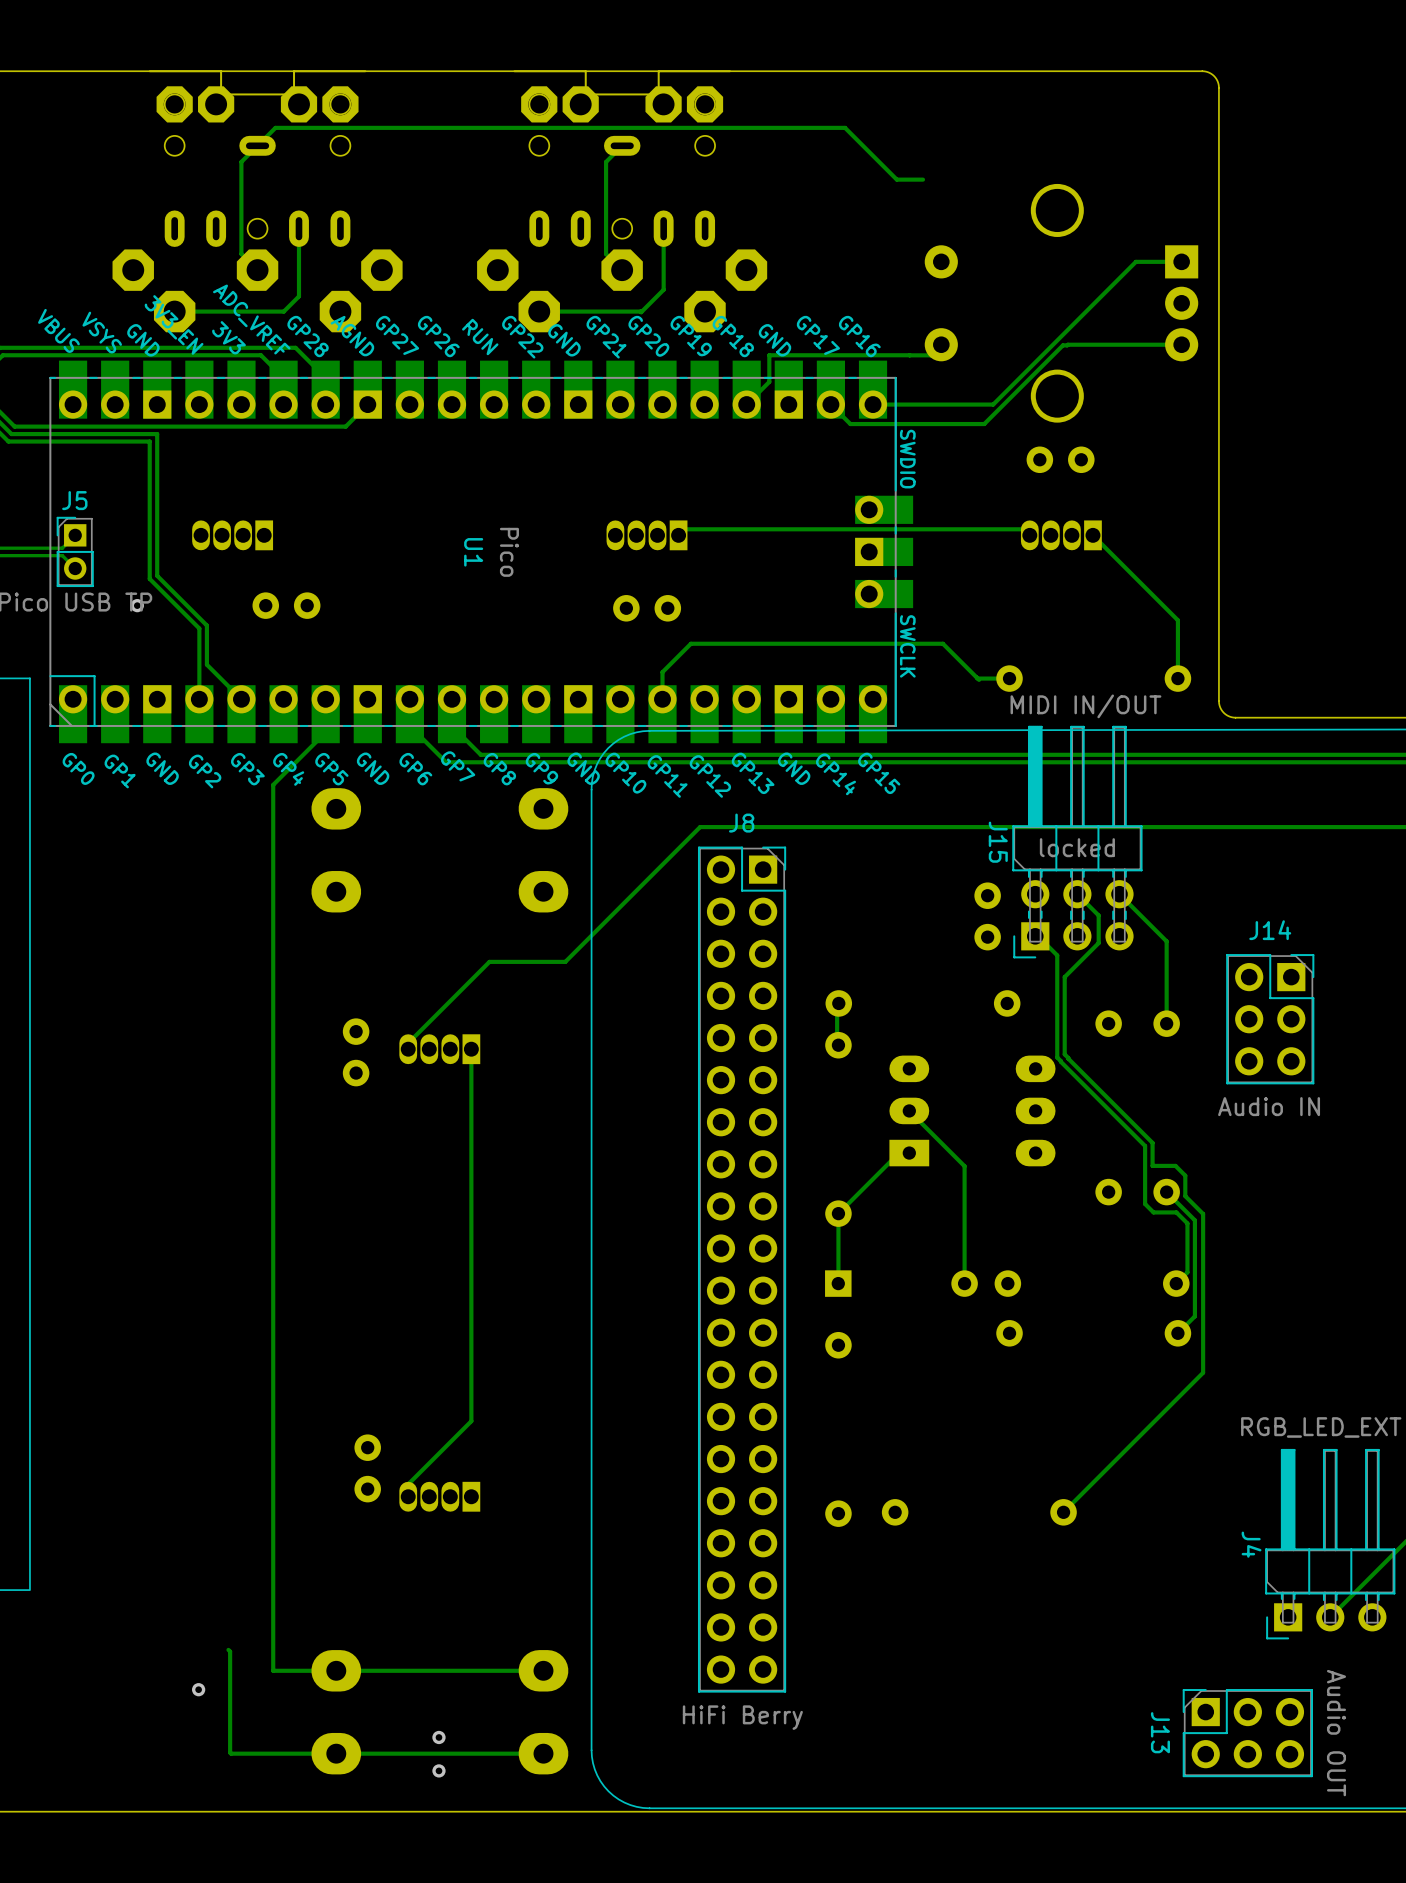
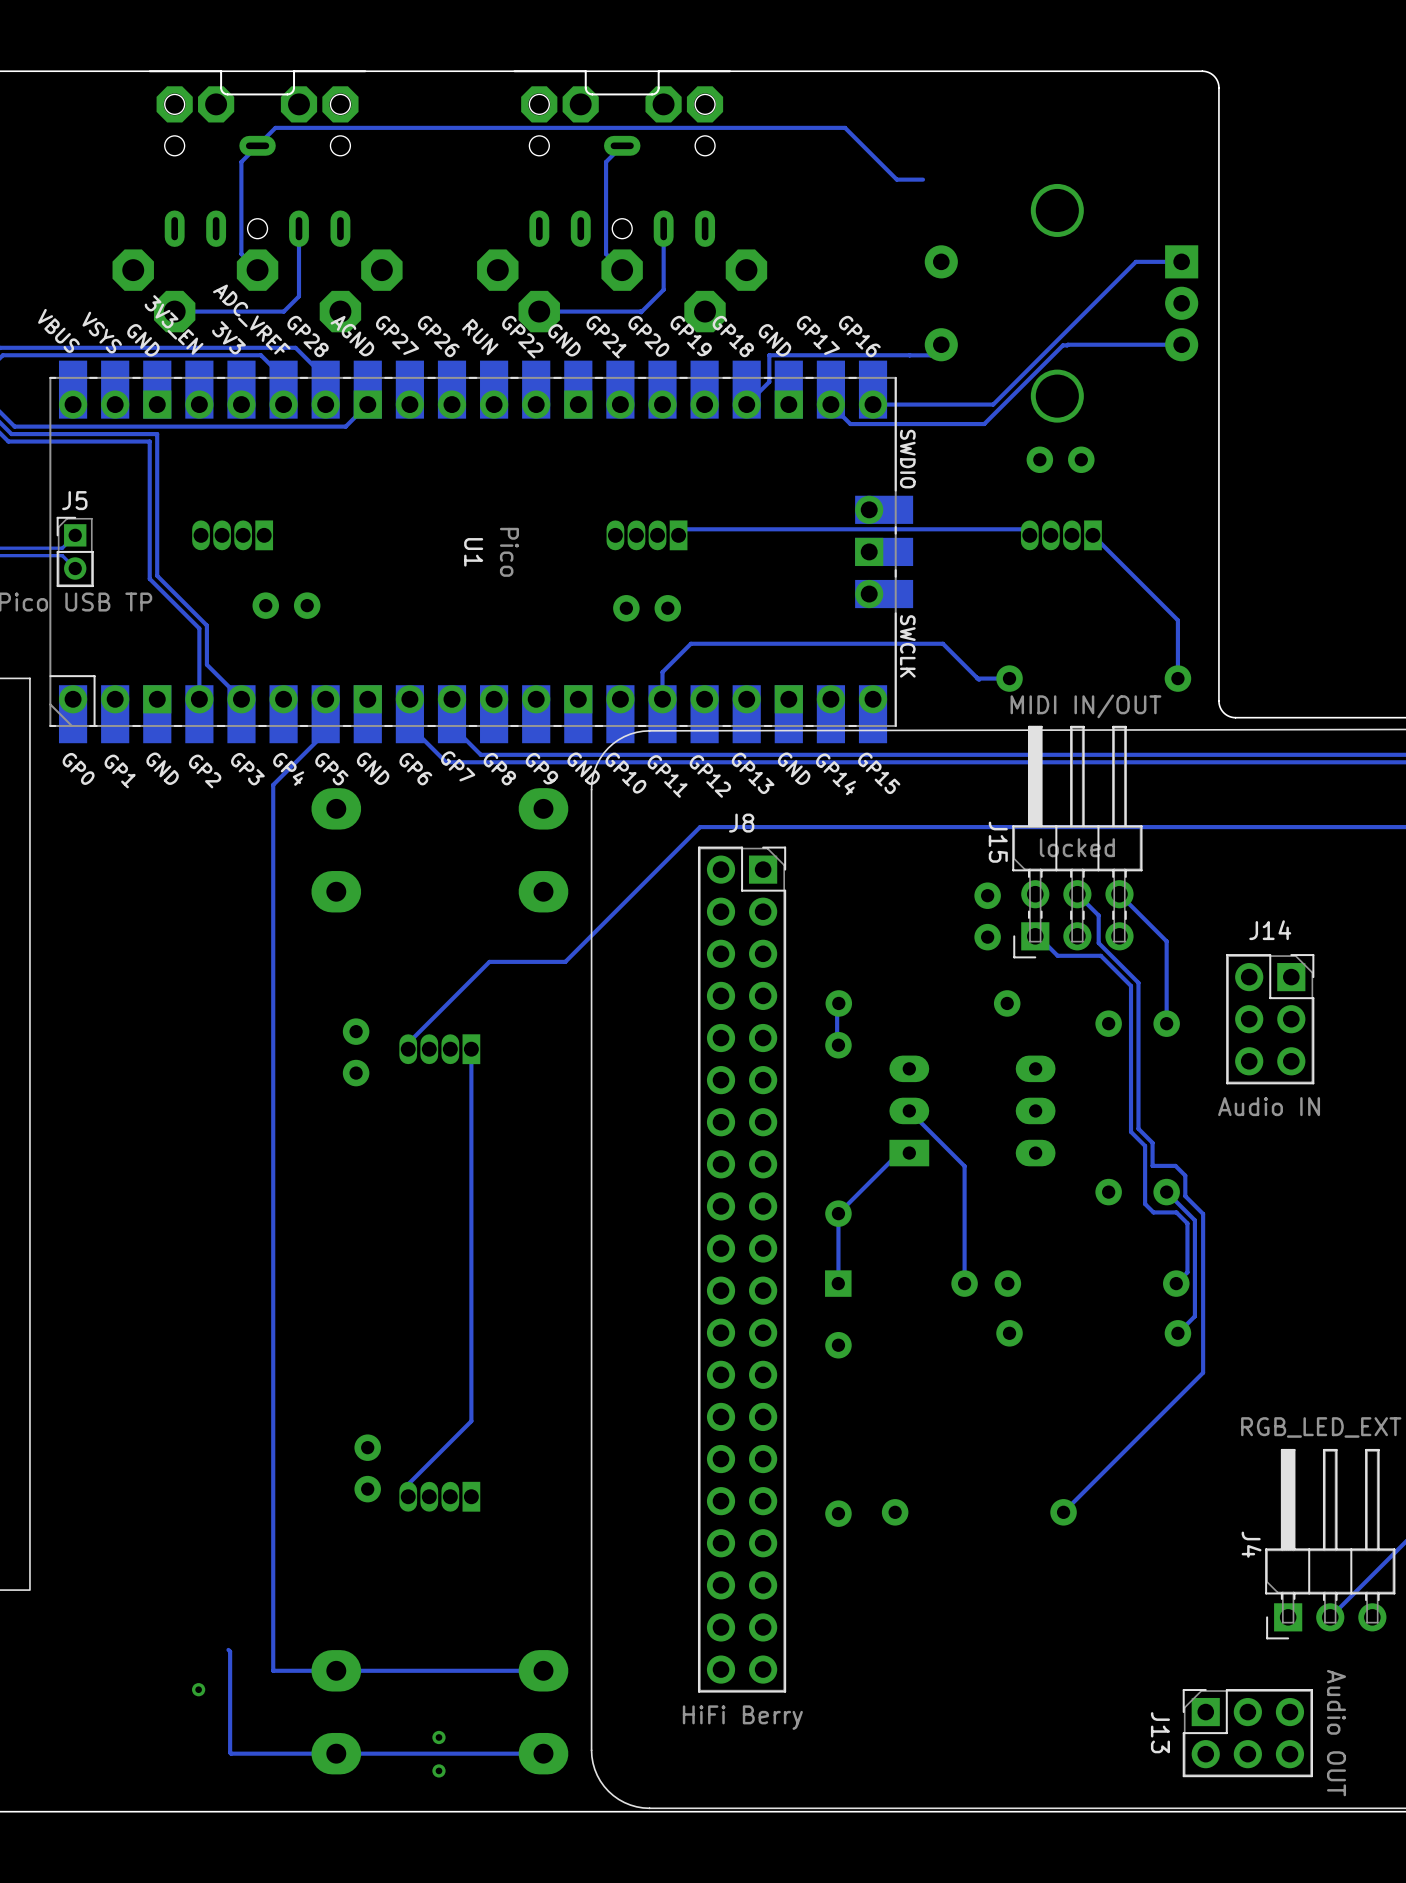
via: (137, 605) -> none
track: (1098, 943) (1064, 977) (1064, 1054) (1138, 1128) -> (1098, 943) (1138, 982) (1138, 1128)
track: (1057, 955) (1057, 1057) (1131, 1131) -> (1057, 955) (1100, 955) (1131, 985) (1131, 1131)

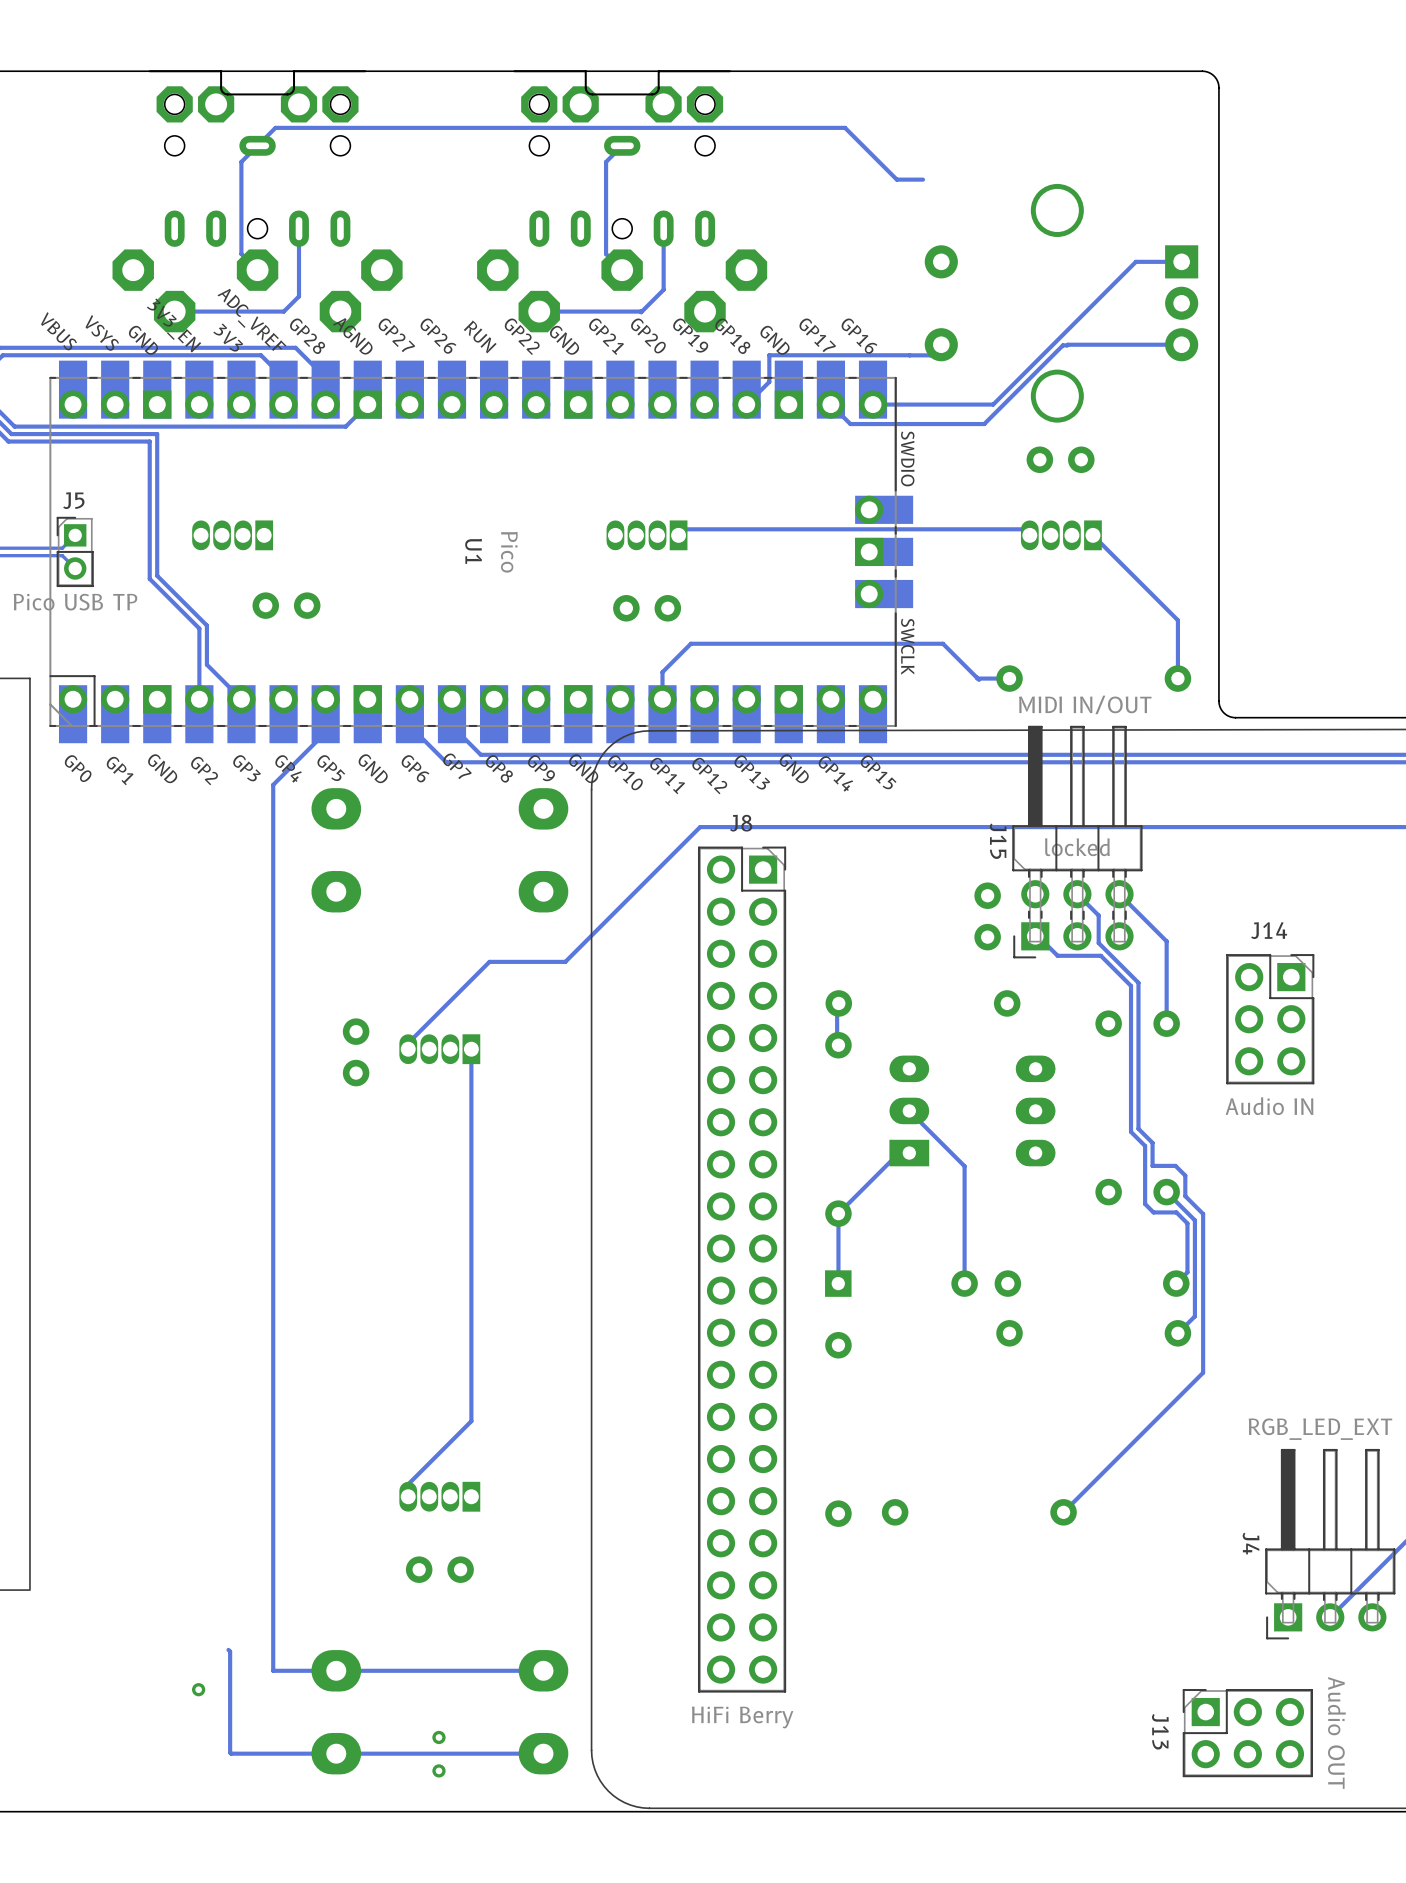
part rotation: 0° (367, 1468) -> 90° clockwise (439, 1569)
part position: (367, 1468) -> (439, 1569)

